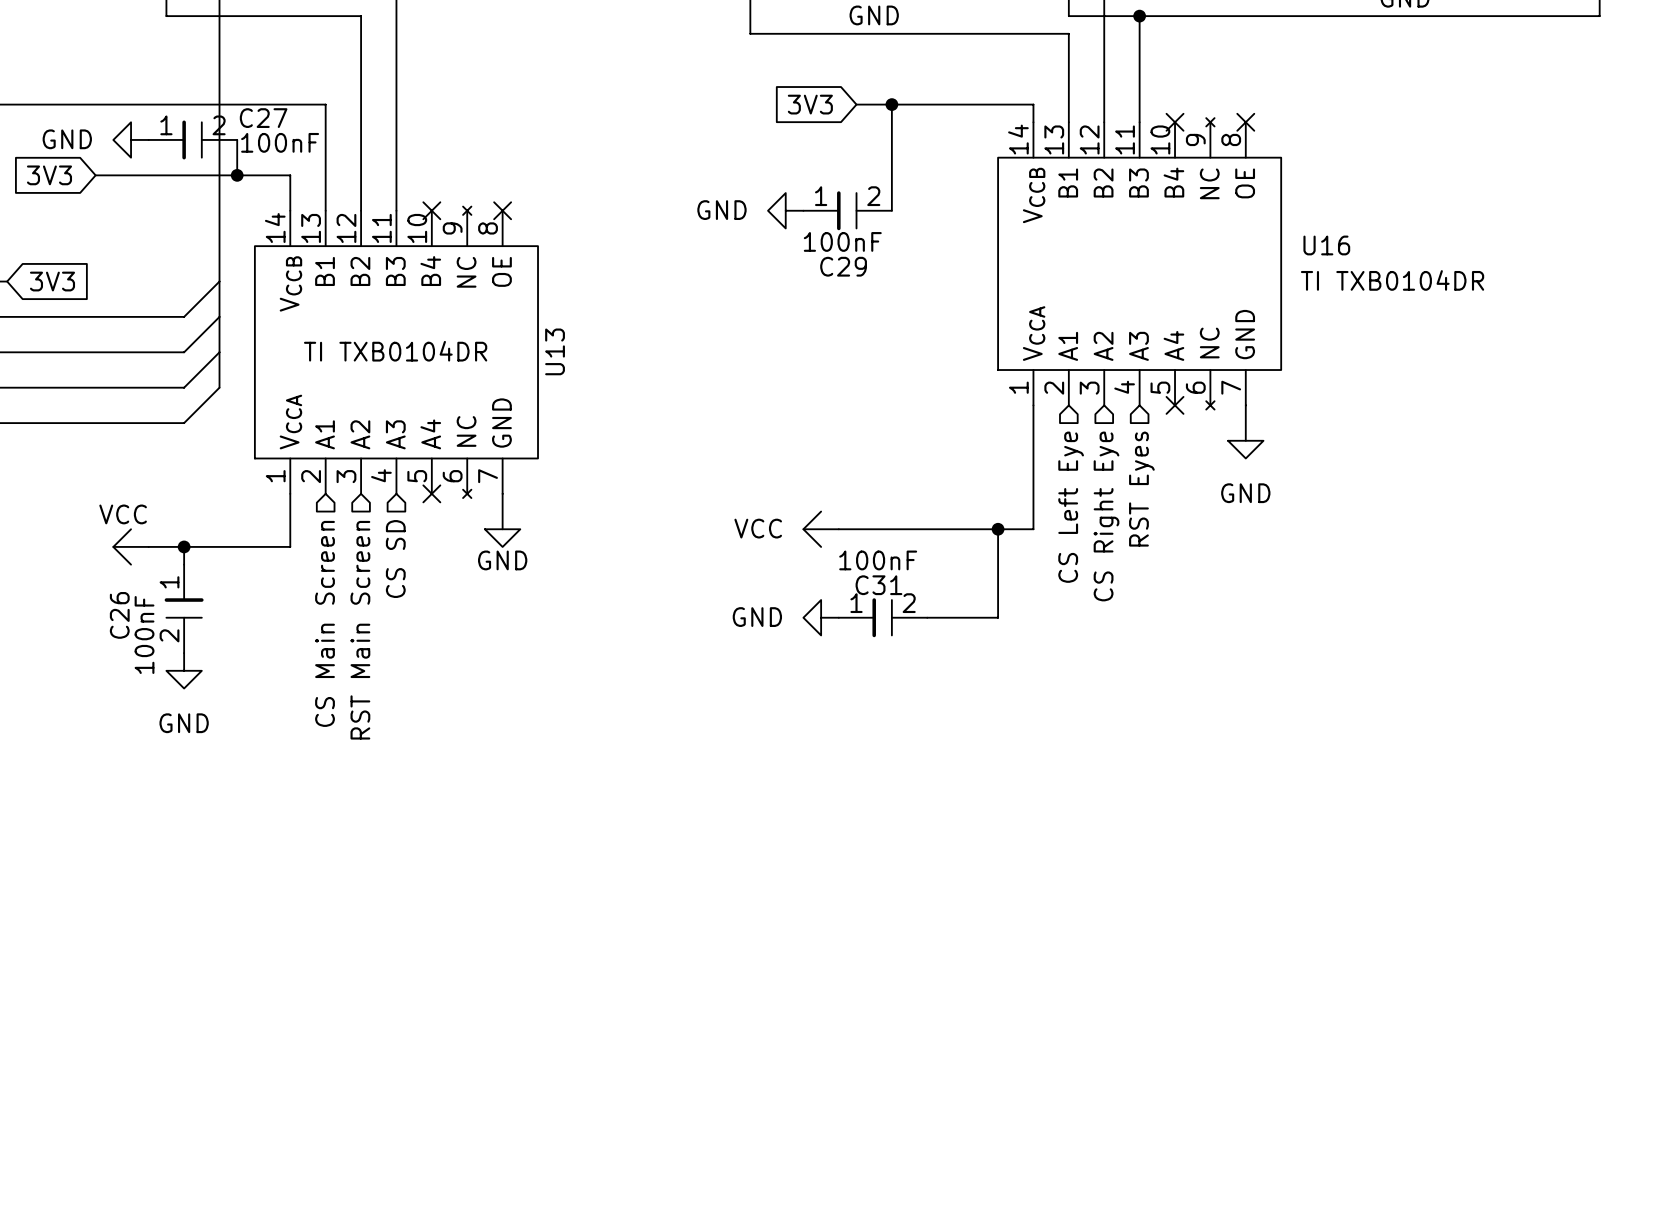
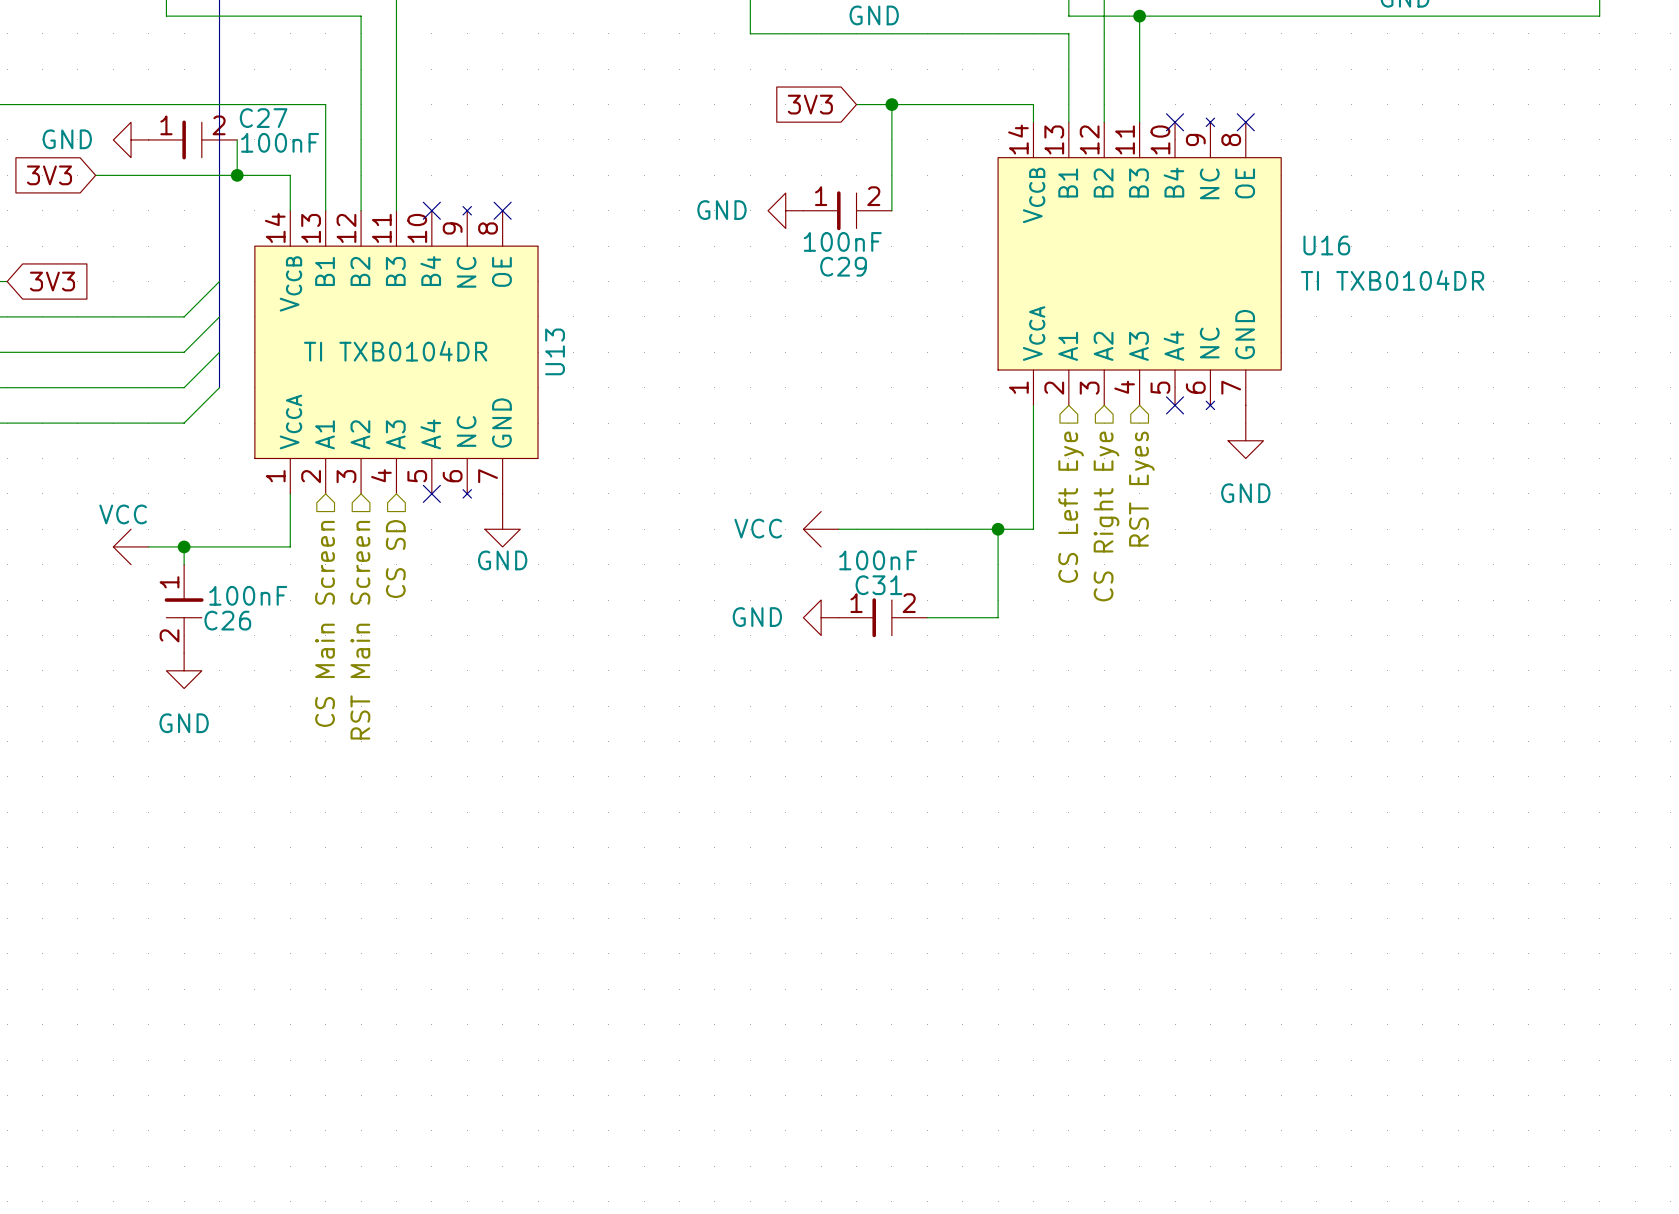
C26 name rotation: 0° (119, 615) -> 90° clockwise (227, 620)
C26 name position: C26 (119, 615) -> C26 (227, 620)
C26 value rotation: 0° (144, 635) -> 90° clockwise (248, 595)
C26 value position: 100nF (144, 635) -> 100nF (248, 595)

